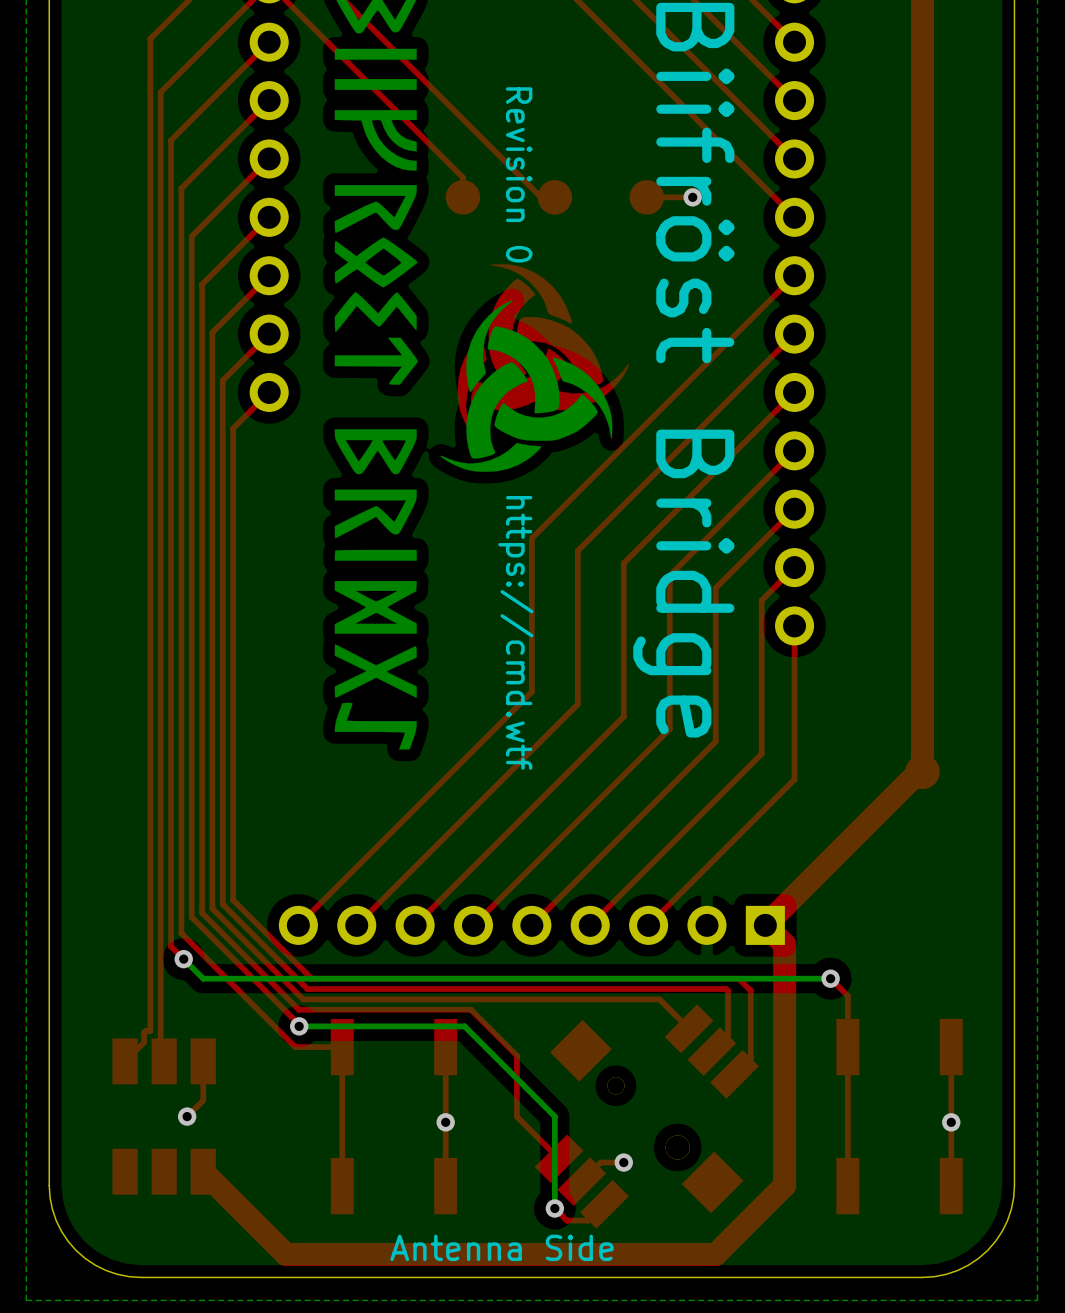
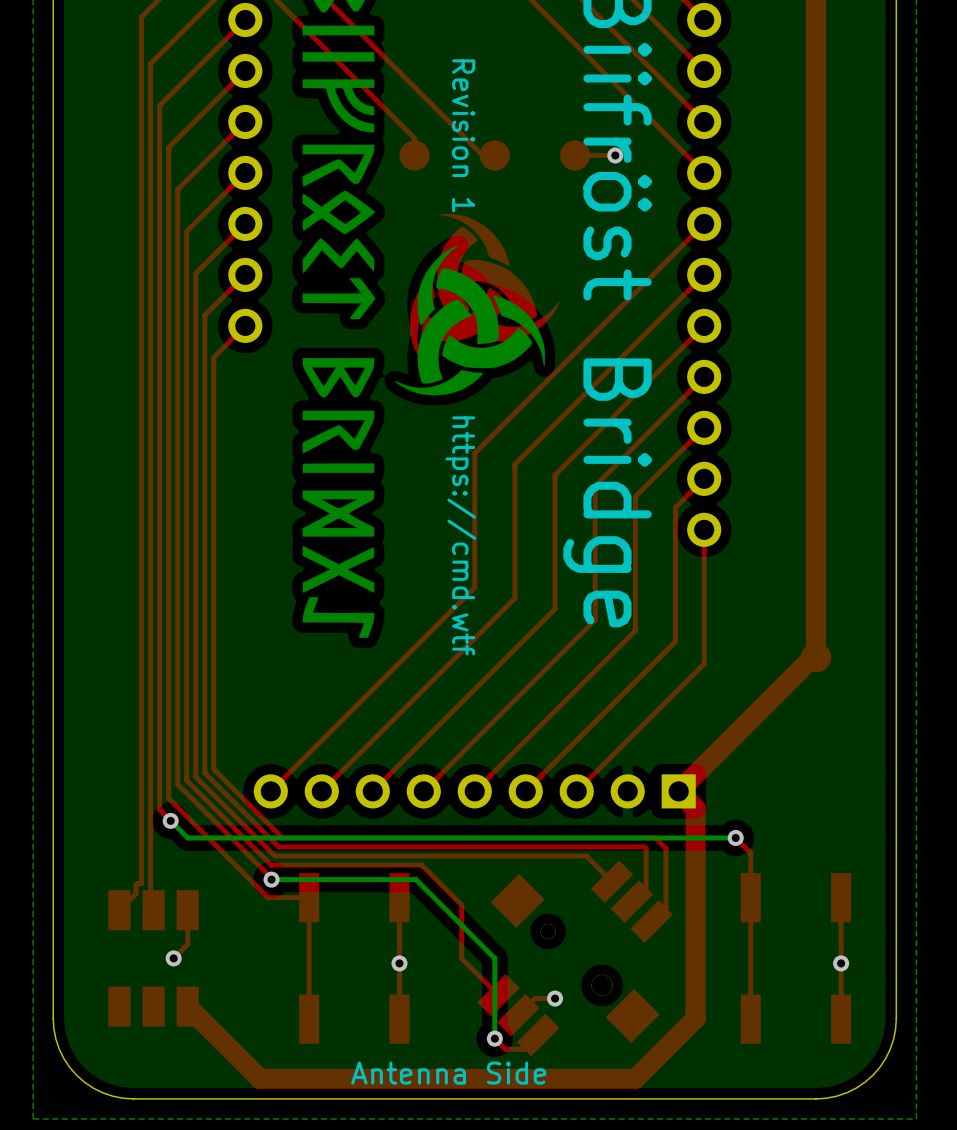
text: Revision 0 (519, 174) -> Revision 1 (463, 135)

